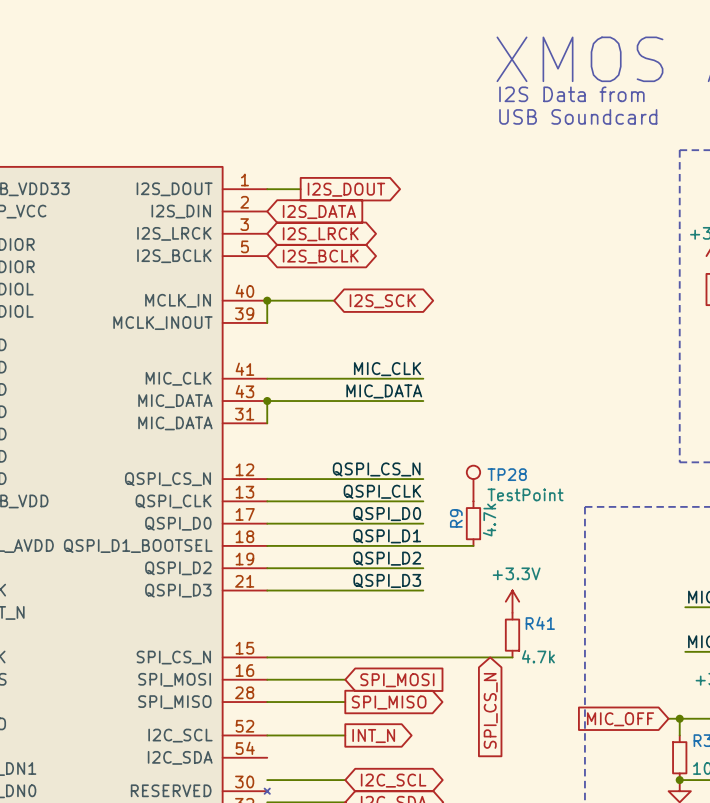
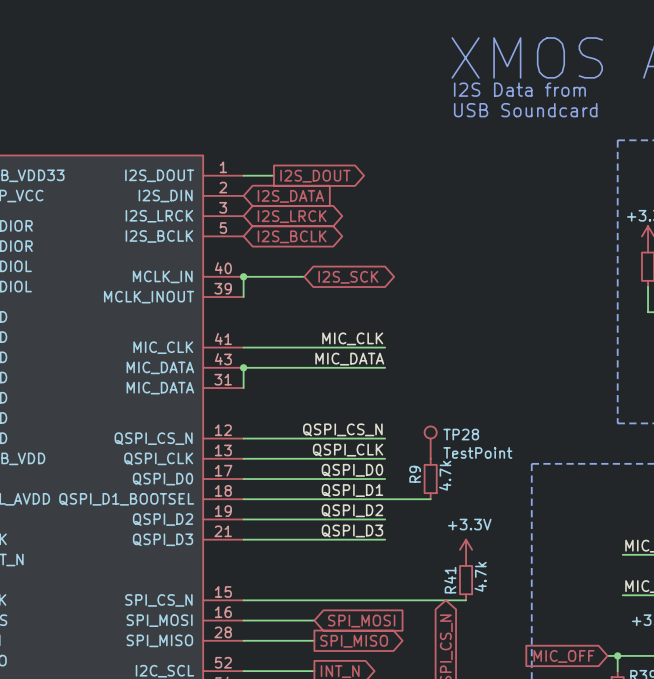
R41 name rotation: 0° (540, 623) -> 90° counterclockwise (450, 580)
R41 name position: R41 (540, 623) -> R41 (450, 580)
R41 value rotation: 0° (538, 656) -> 90° counterclockwise (480, 576)

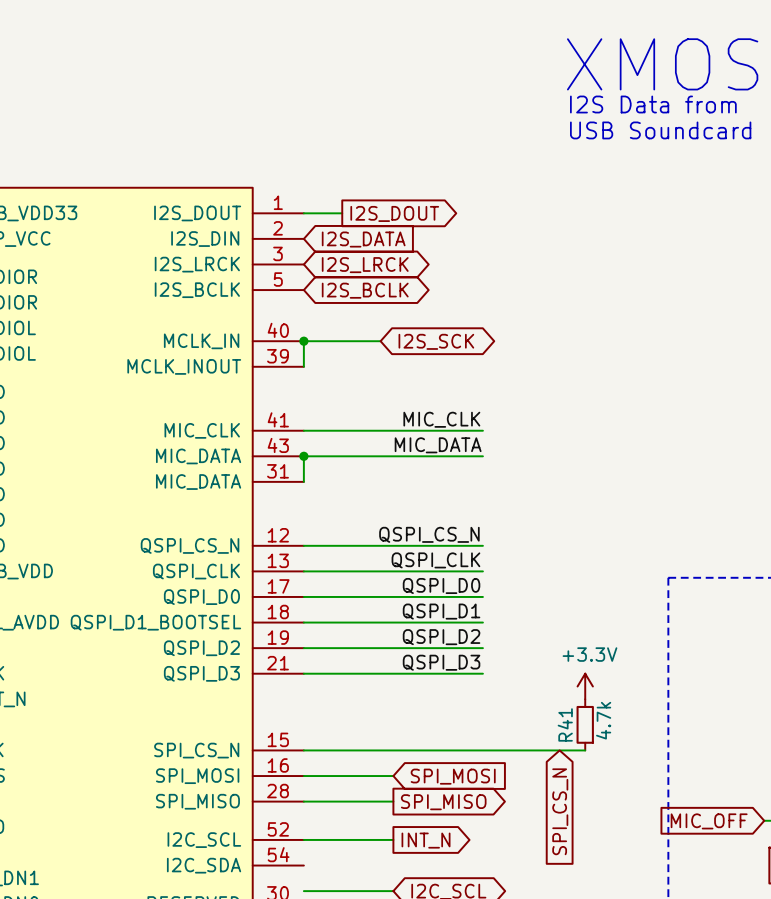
TP28: TestPoint (430, 442) -> none
R9: 4.7k (430, 479) -> none
wire: (385, 499) (430, 499) -> none

